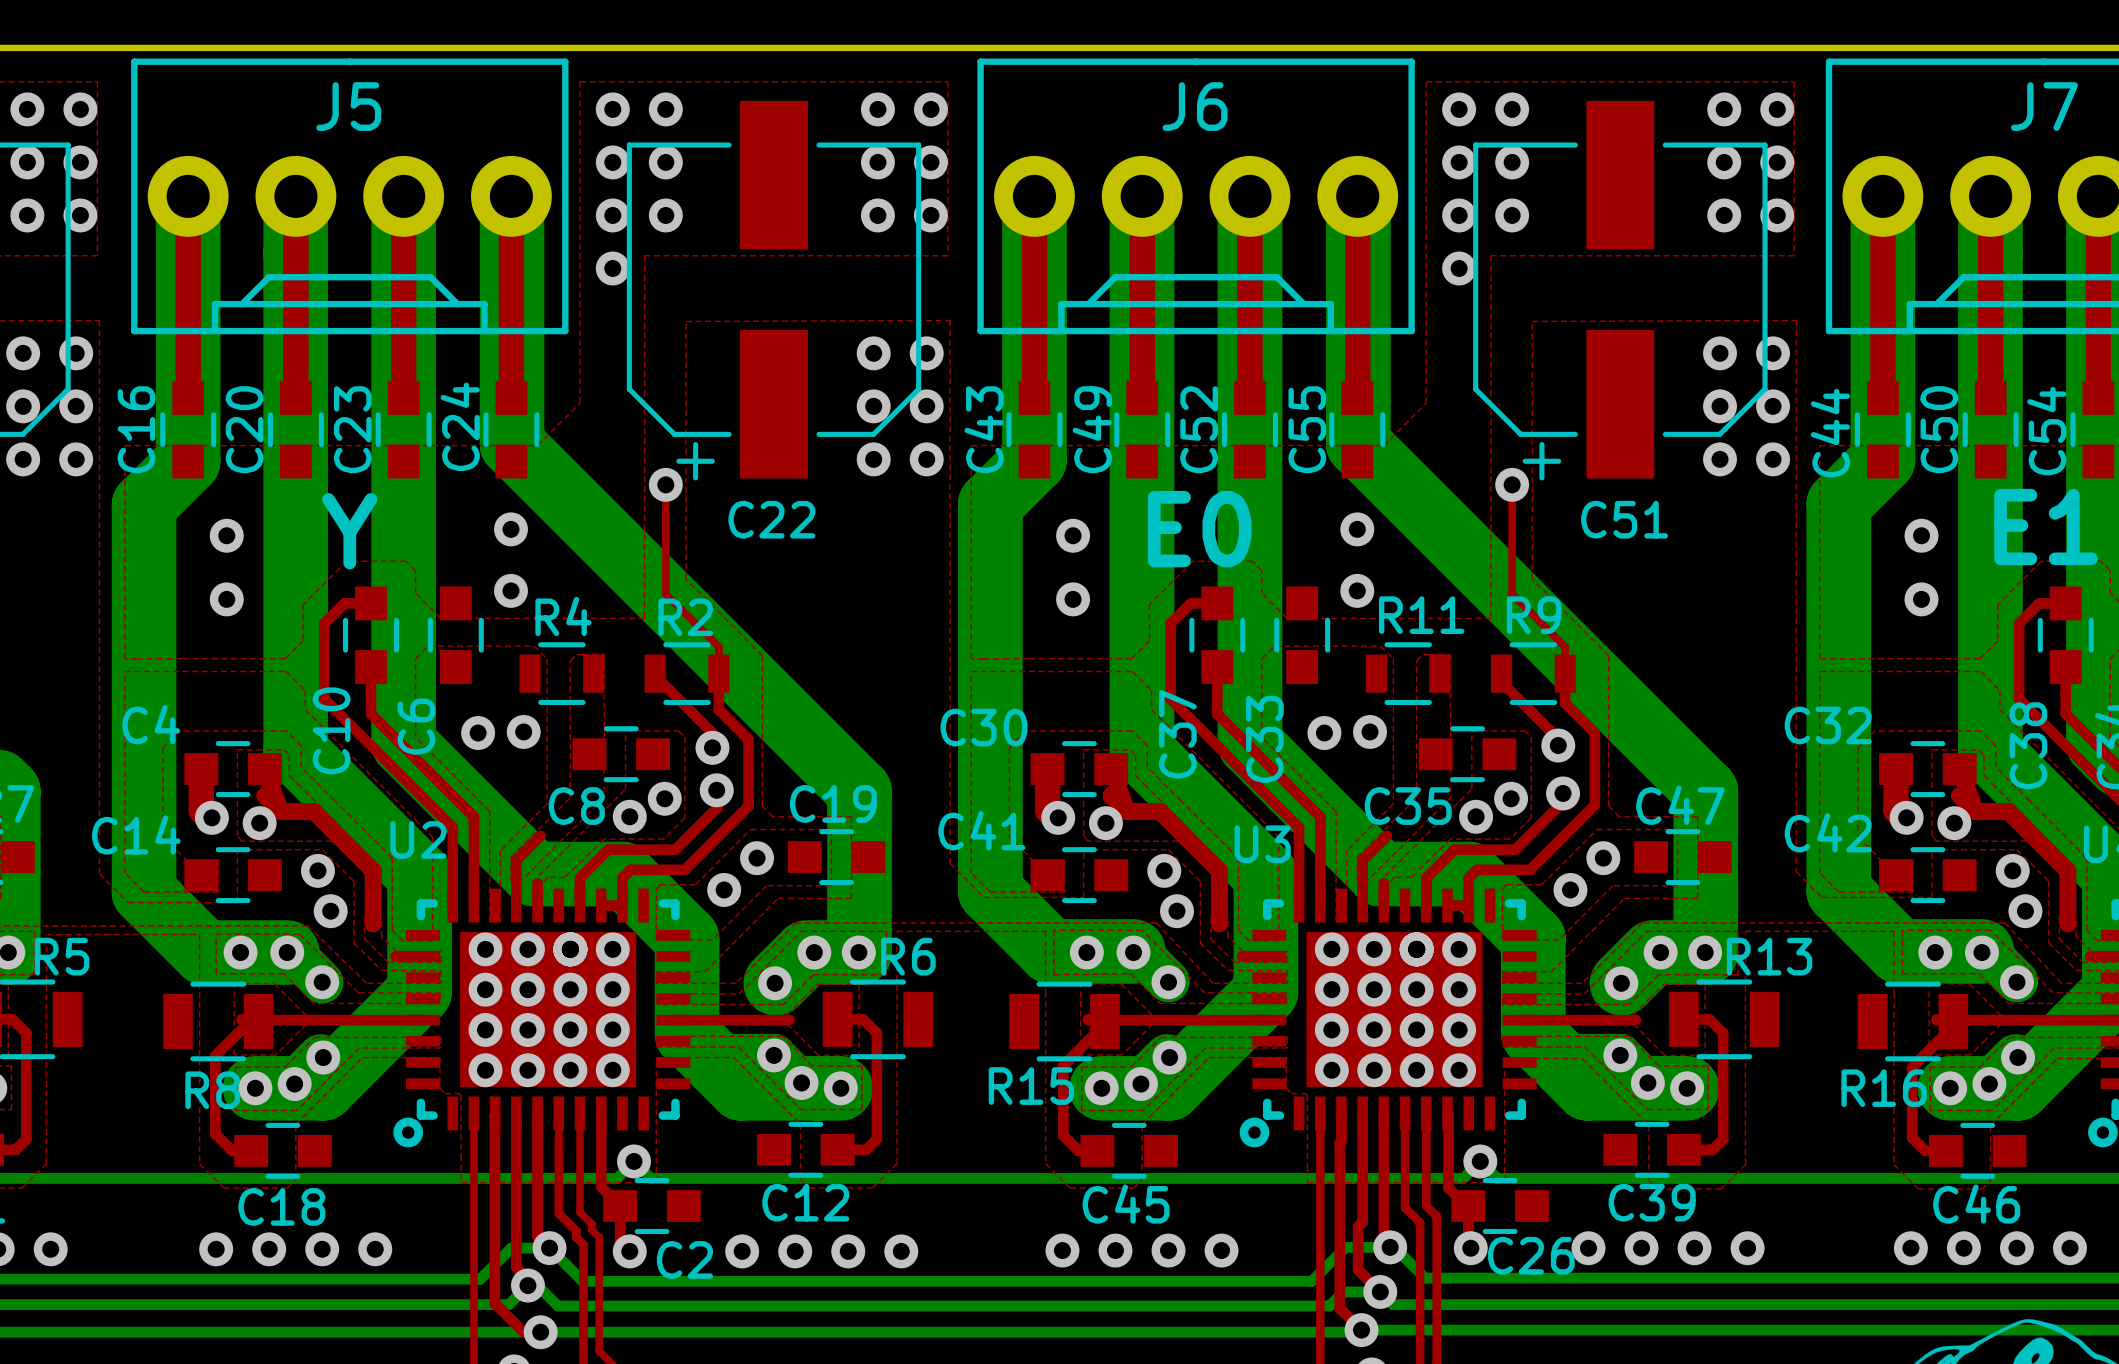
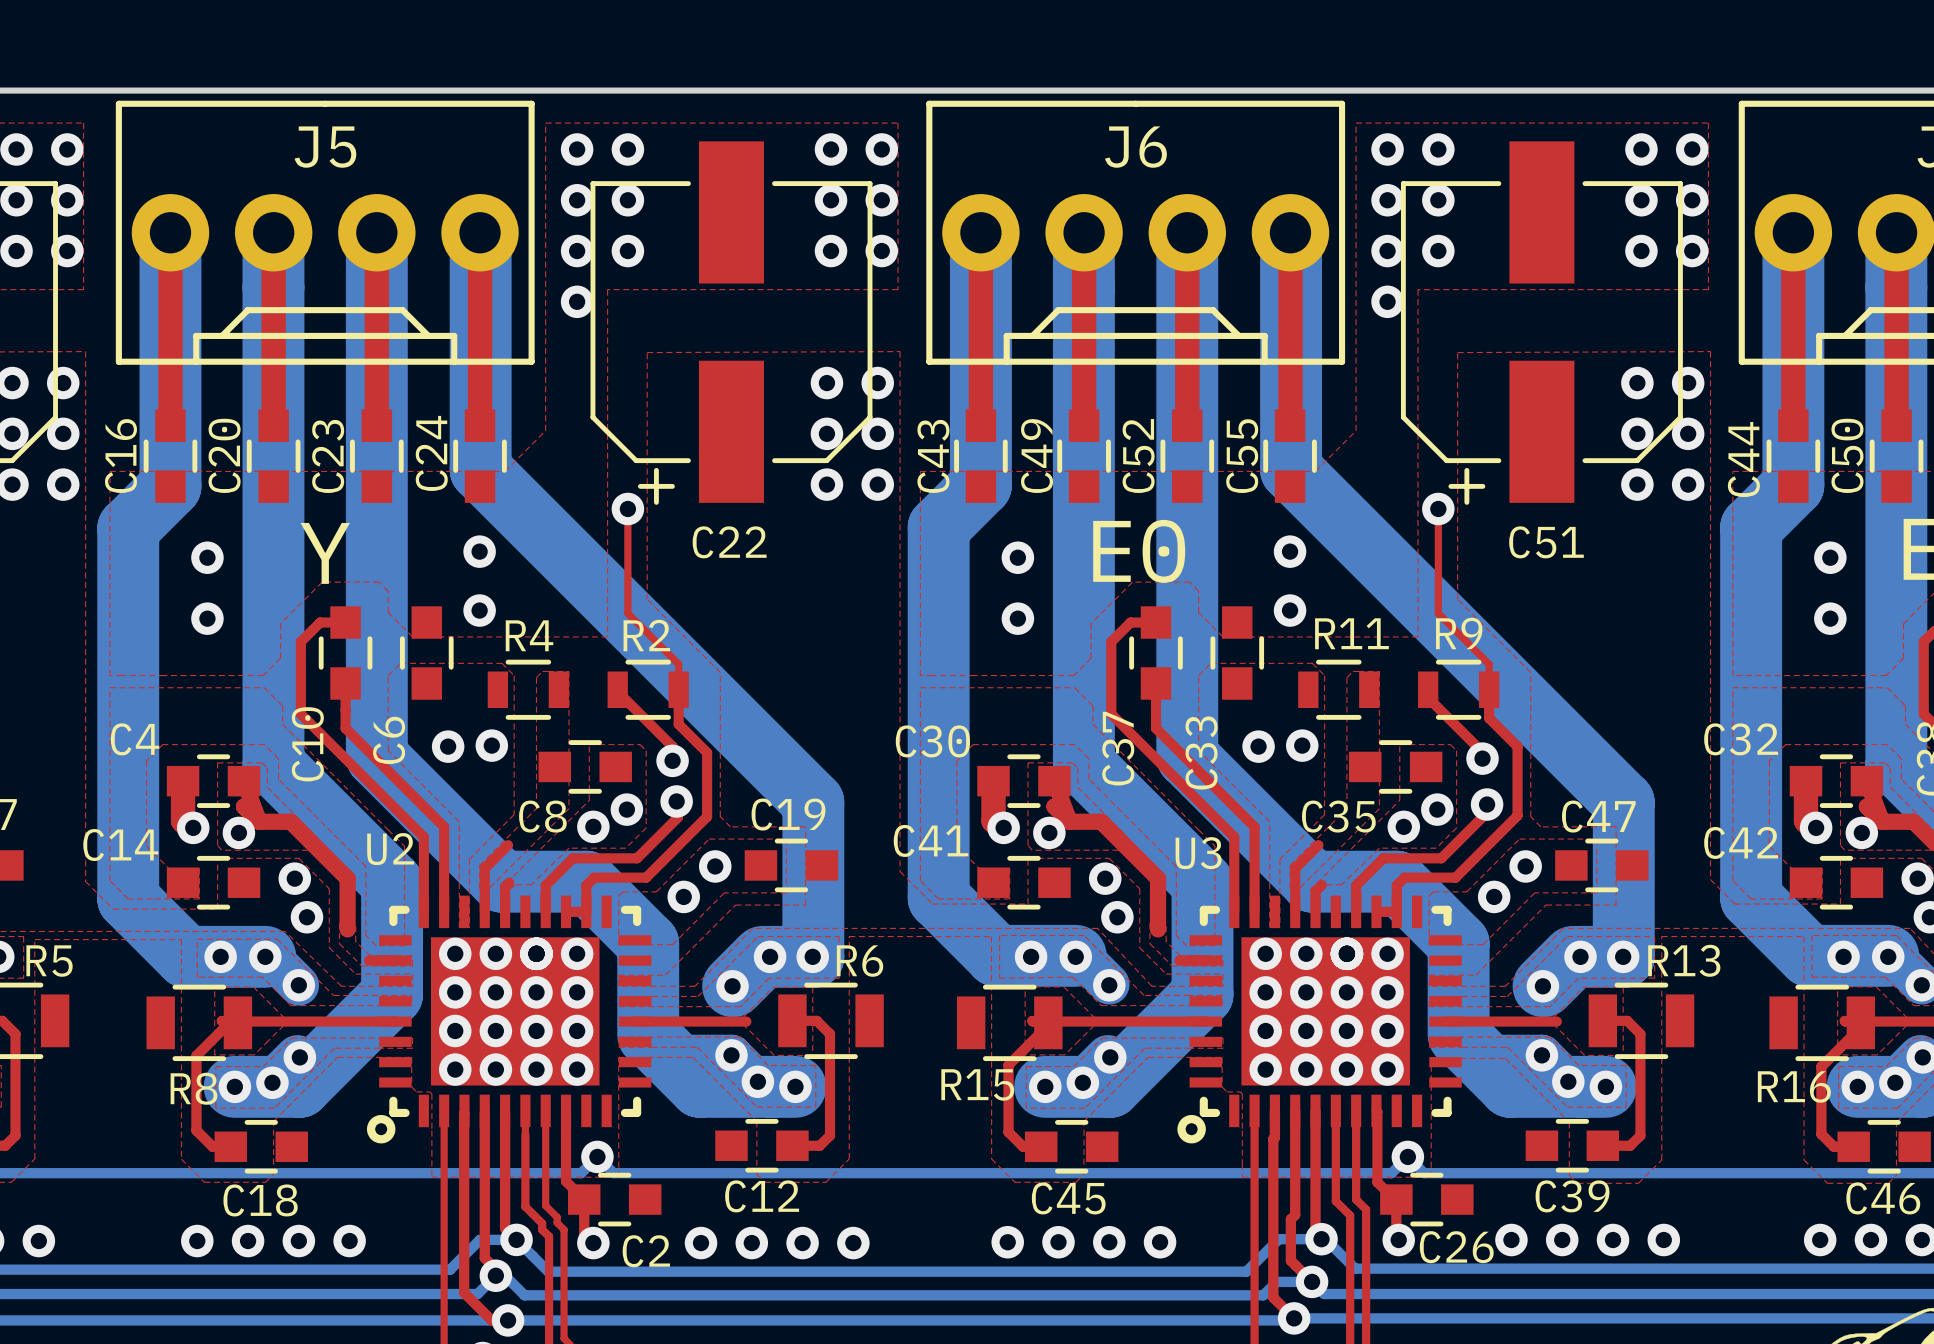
top track: none -> (509, 882) (505, 886) (505, 890)
top track: none -> (1321, 885) (1316, 890)

